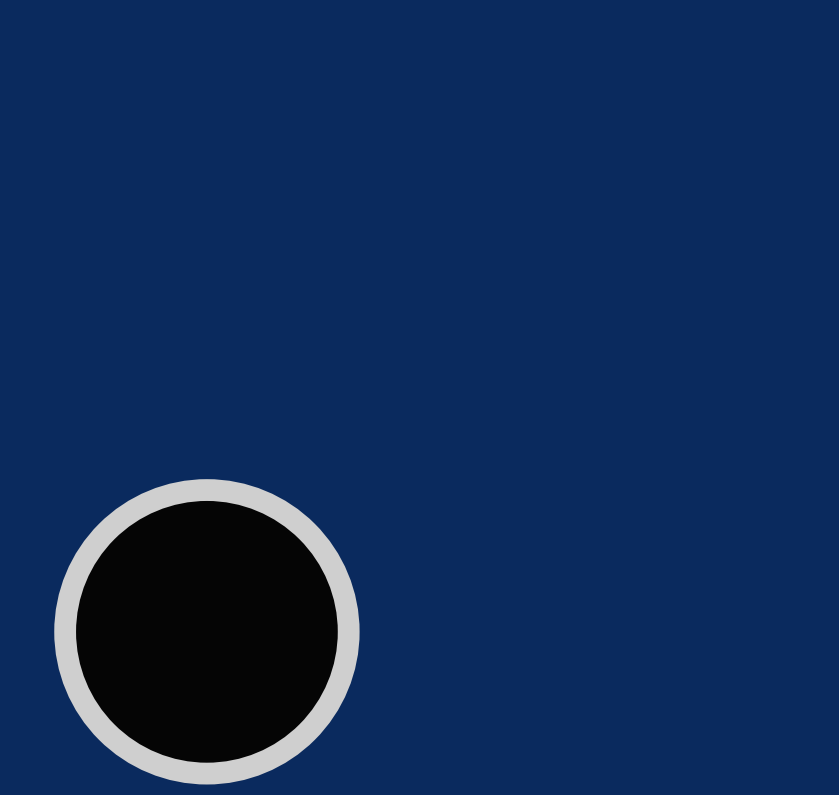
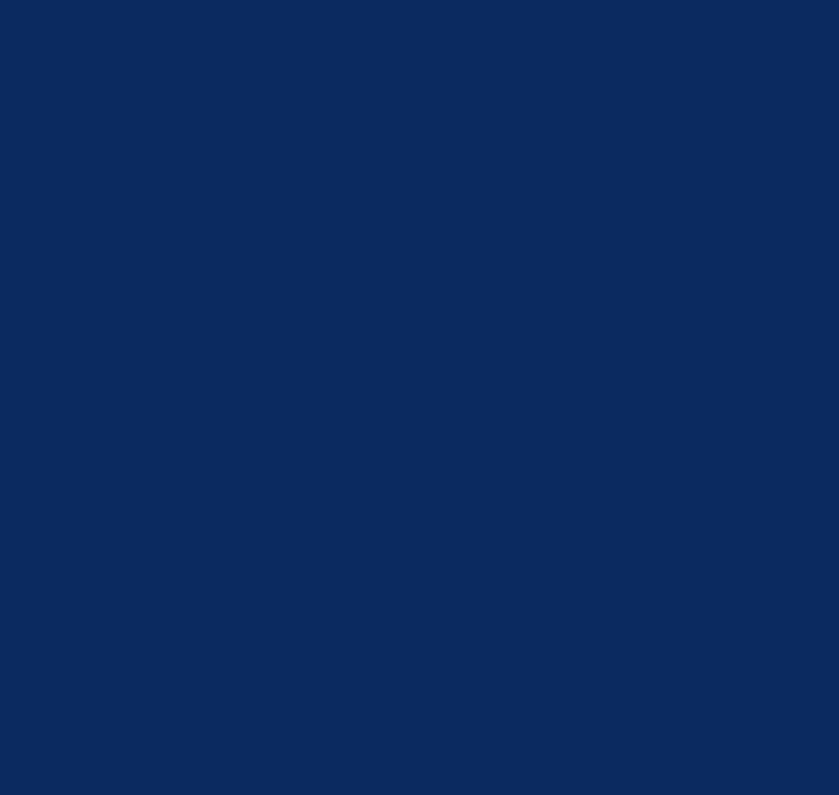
part: (206, 631) -> none

